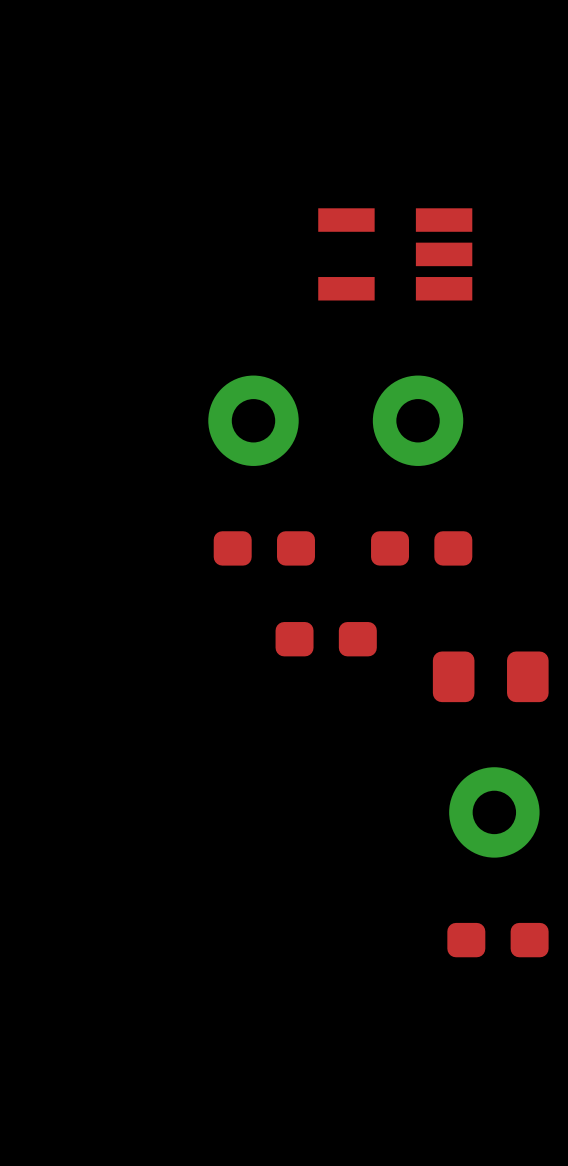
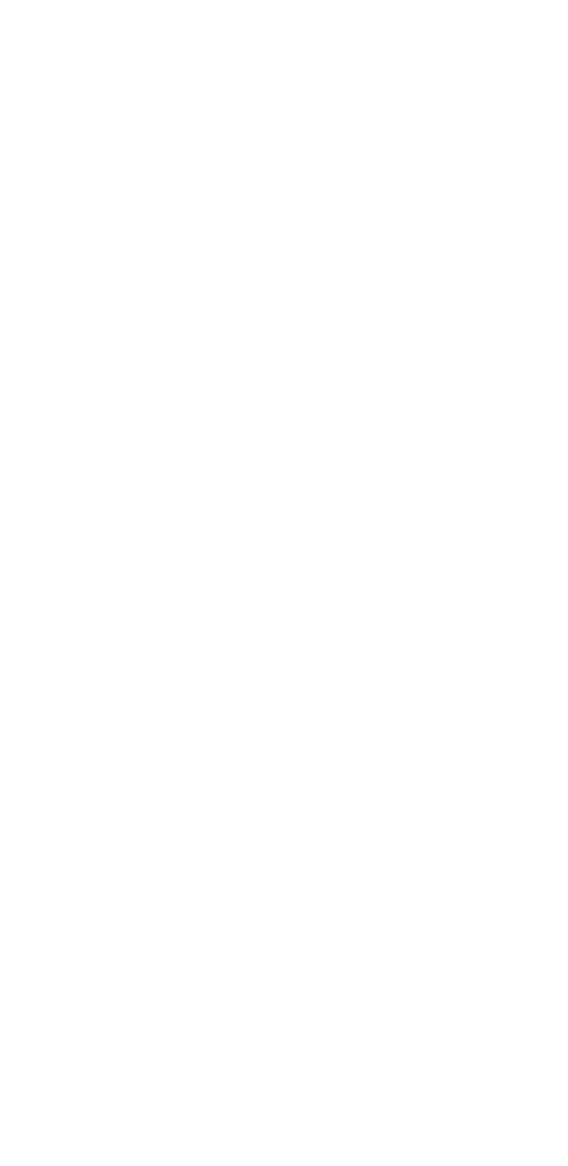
part: (395, 254) -> none
part: (253, 420) -> none
part: (418, 420) -> none
part: (264, 548) -> none
part: (421, 548) -> none
part: (326, 639) -> none
part: (490, 676) -> none
part: (494, 812) -> none
part: (497, 940) -> none

